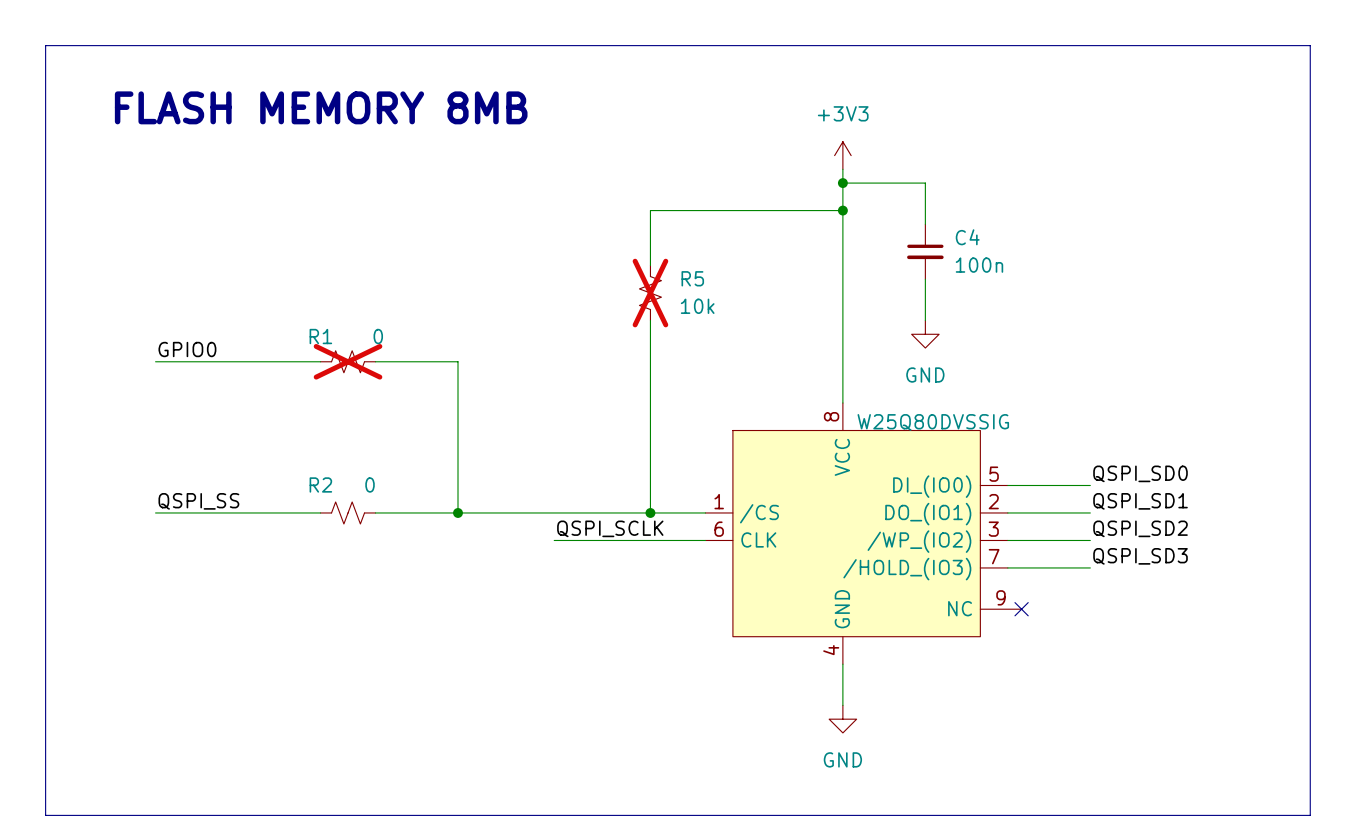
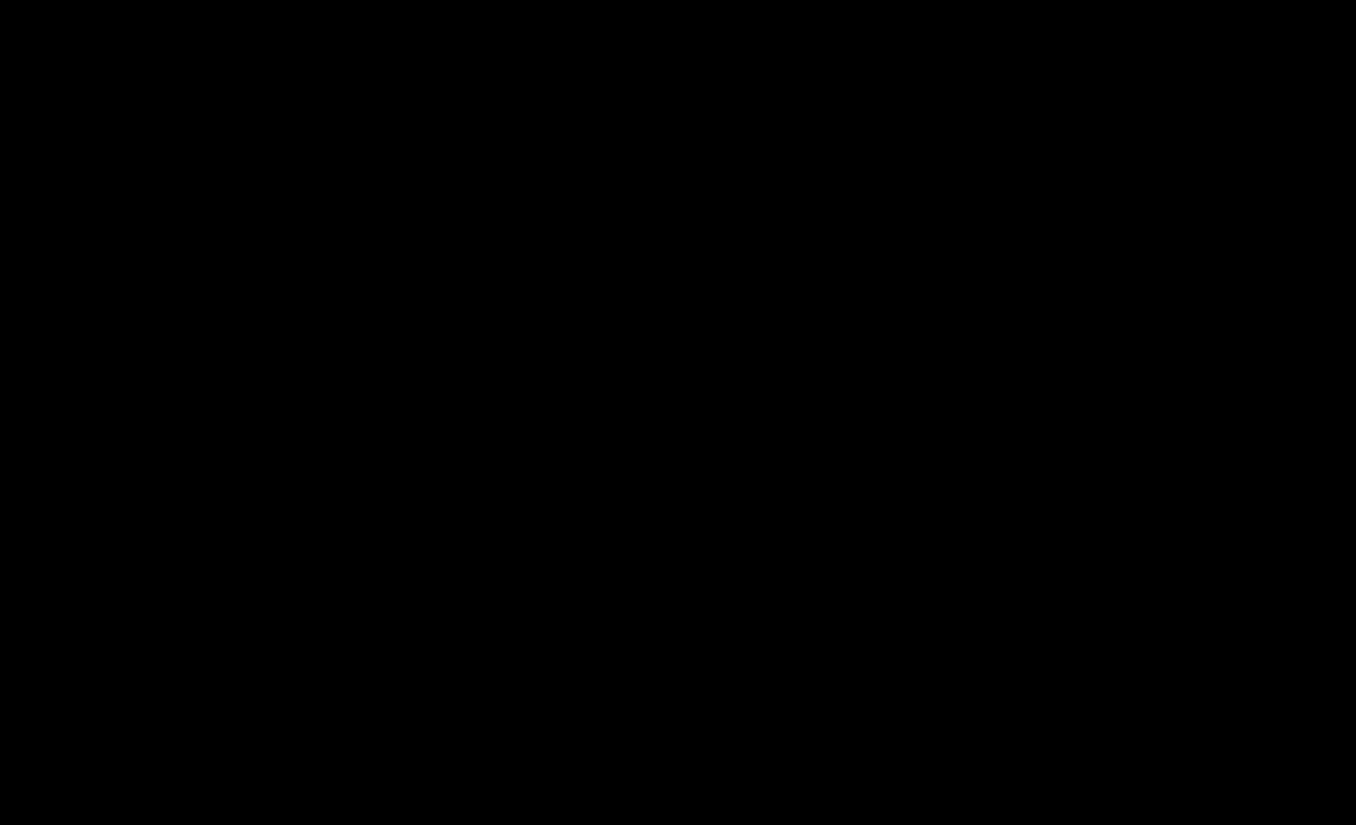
line: (45, 45) (1310, 45) (1310, 815) (45, 815) (45, 45) -> none
text: FLASH MEMORY 8MB (321, 107) -> none
power symbol: +3V3 (842, 155) -> none
wire: (842, 169) (842, 403) -> none
wire: (842, 183) (925, 183) (925, 224) -> none
junction: (842, 183) -> none
wire: (842, 210) (650, 210) (650, 265) -> none
junction: (842, 210) -> none
C4: 100n (925, 251) -> none
wire: (925, 279) (925, 320) -> none
R5: 10k (650, 293) -> none
wire: (650, 320) (650, 512) -> none
power symbol: GND (925, 334) -> none
label: GPIO0 (187, 349) -> none
wire: (155, 361) (320, 361) -> none
R1: 0 (348, 361) -> none
wire: (375, 361) (458, 361) (458, 512) -> none
label: QSPI_SD0 (1140, 473) -> none
wire: (1007, 485) (1090, 485) -> none
label: QSPI_SS (198, 501) -> none
label: QSPI_SD1 (1140, 501) -> none
wire: (155, 512) (320, 512) -> none
R2: 0 (348, 512) -> none
wire: (375, 512) (705, 512) -> none
junction: (458, 512) -> none
junction: (650, 512) -> none
wire: (1007, 512) (1090, 512) -> none
label: QSPI_SCLK (610, 528) -> none
label: QSPI_SD2 (1140, 528) -> none
part: W25Q80DVSSIG (863, 533) -> none
wire: (554, 540) (705, 540) -> none
wire: (1007, 540) (1090, 540) -> none
label: QSPI_SD3 (1140, 556) -> none
wire: (1007, 567) (1090, 567) -> none
no-connect mark: (1021, 609) -> none
wire: (842, 664) (842, 705) -> none
power symbol: GND (842, 719) -> none

